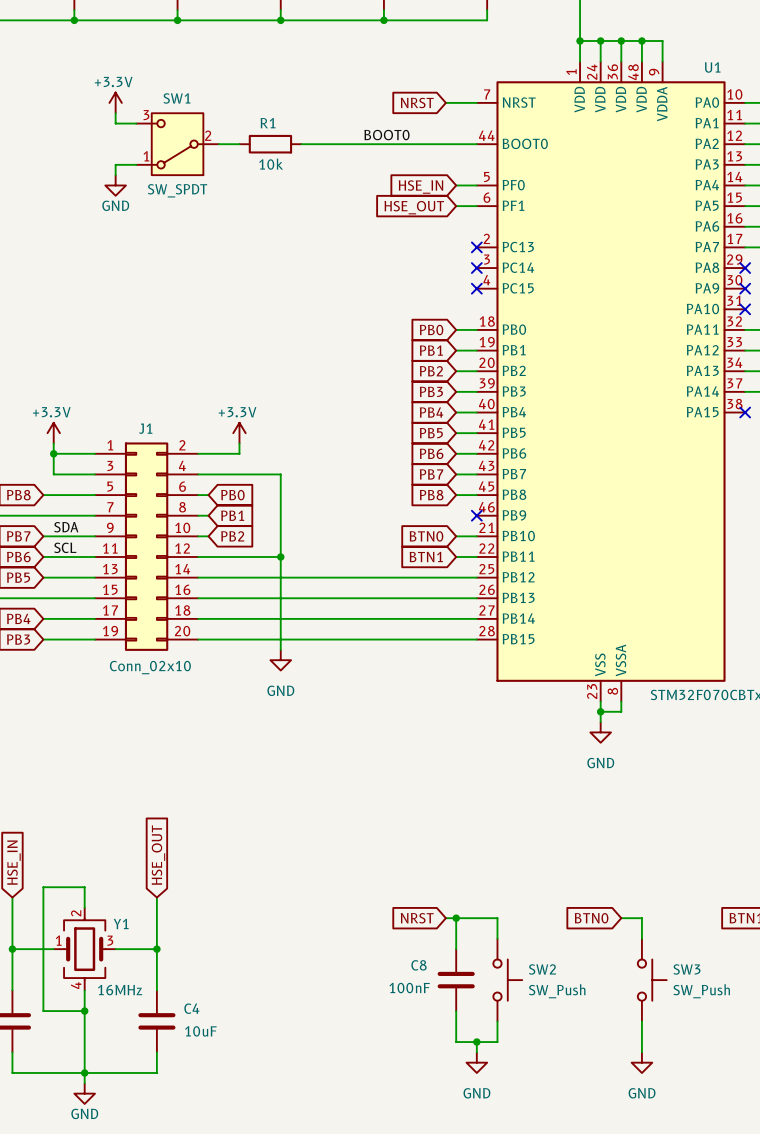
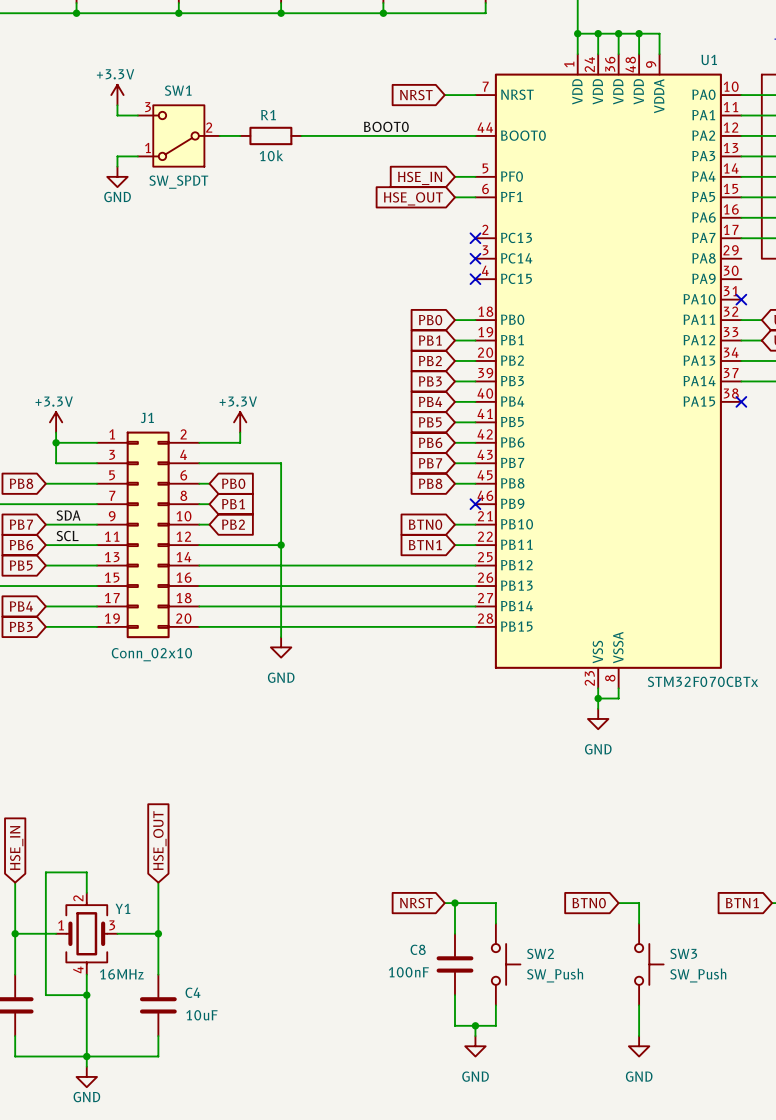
no-connect mark: (745, 268) -> none
no-connect mark: (745, 288) -> none

